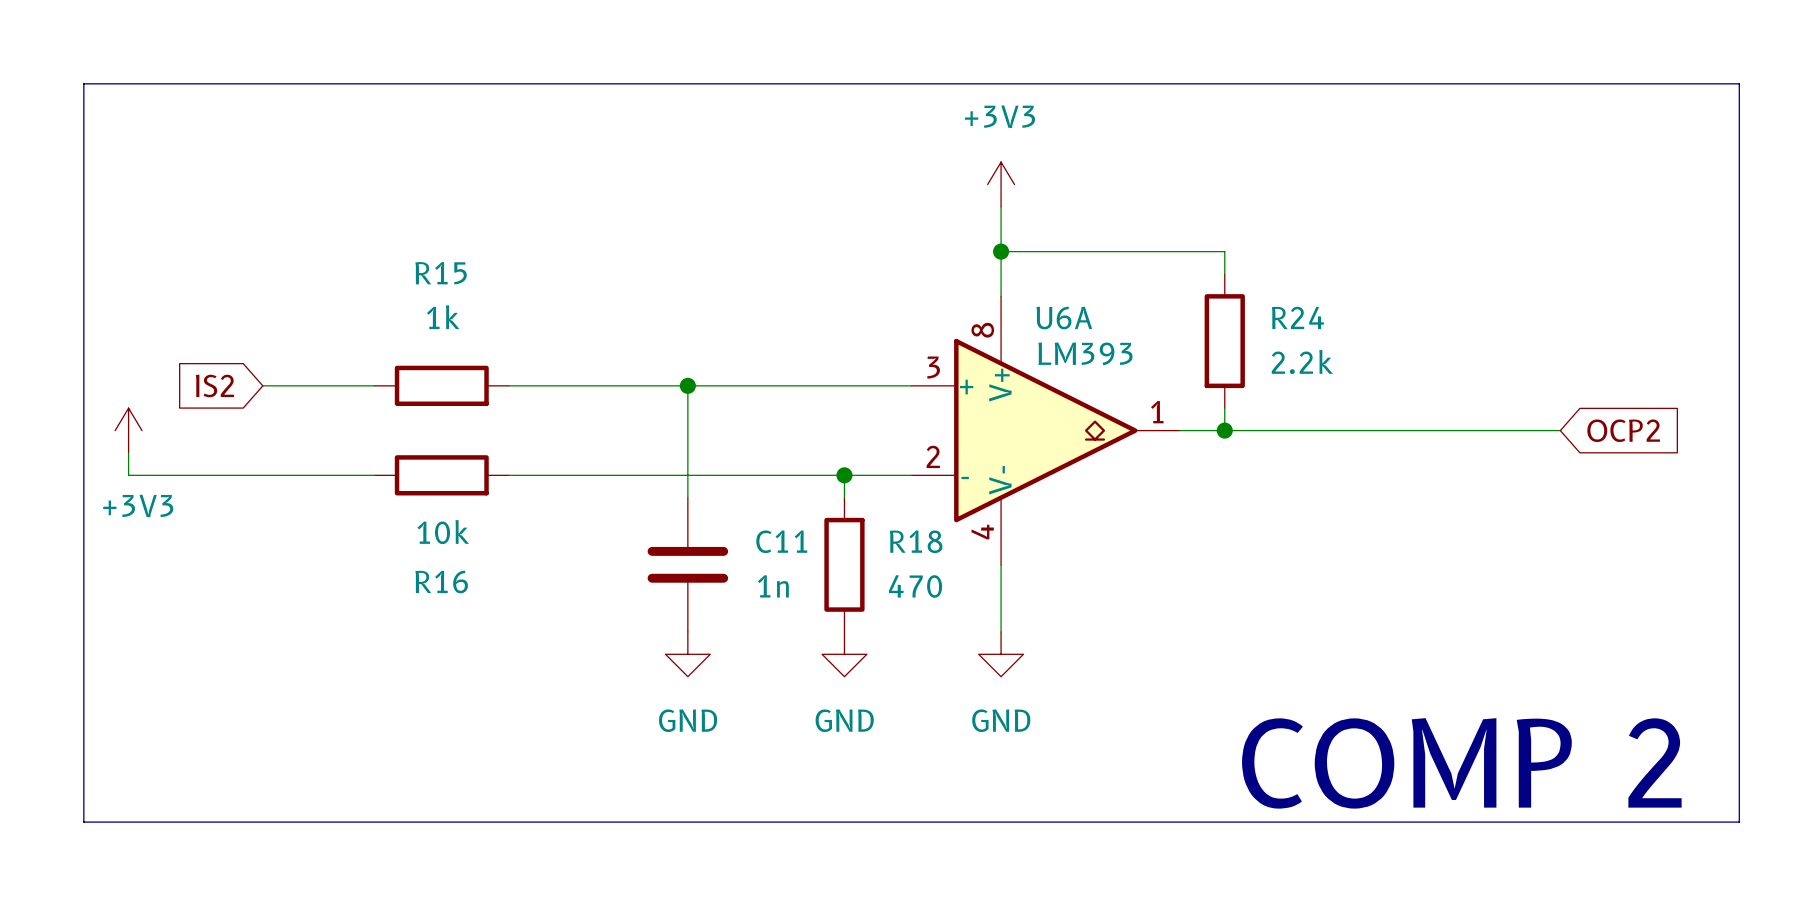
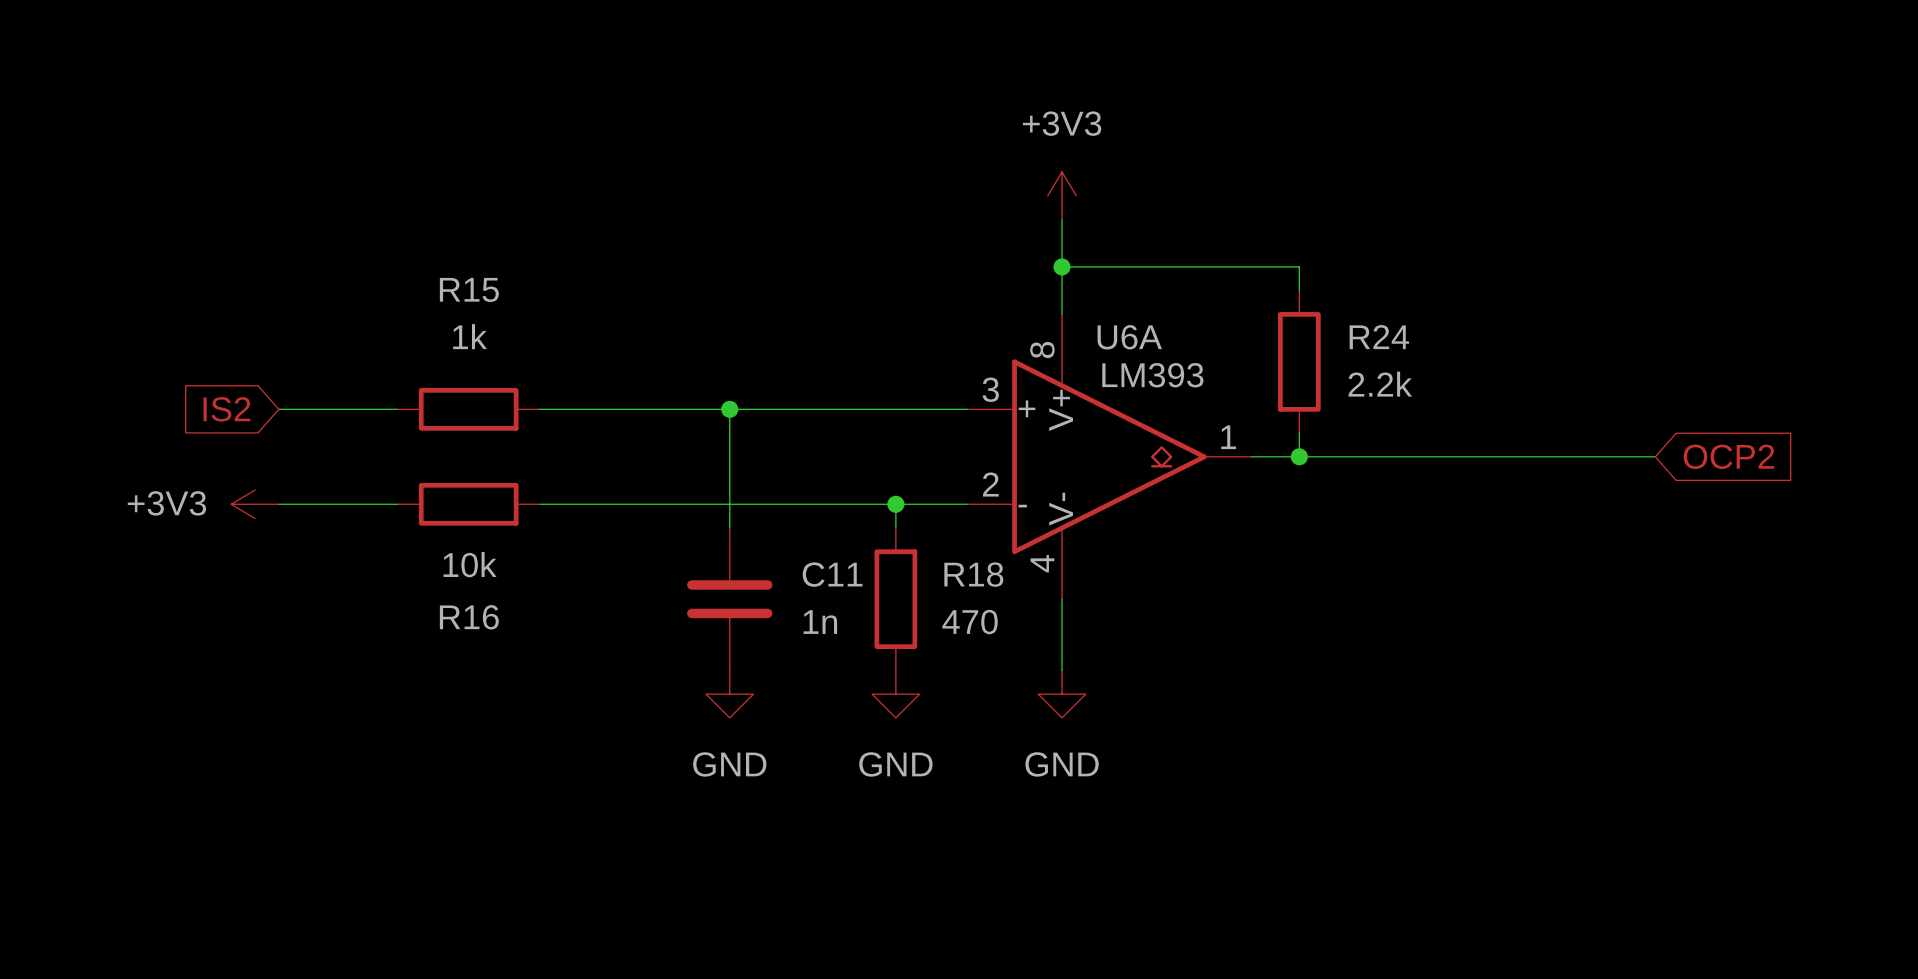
line: (83, 83) (1739, 83) (1739, 822) (83, 822) (83, 83) -> none
power symbol rotation: 0° (128, 430) -> 90° counterclockwise (255, 504)
power symbol position: +3V3 (128, 430) -> +3V3 (255, 504)
wire: (128, 452) (128, 475) (262, 475) -> none
power symbol text position: +3V3 (138, 505) -> +3V3 (166, 503)
text: COMP 2 (1461, 763) -> none

